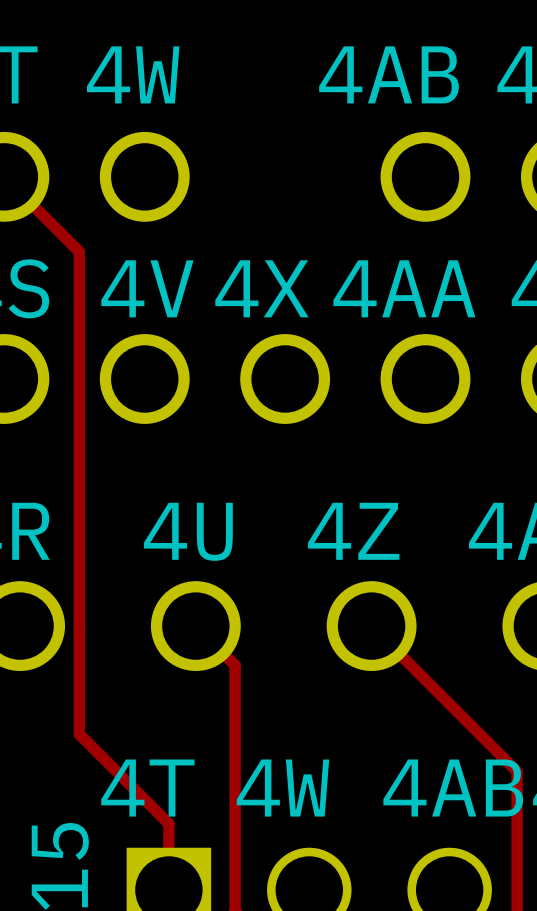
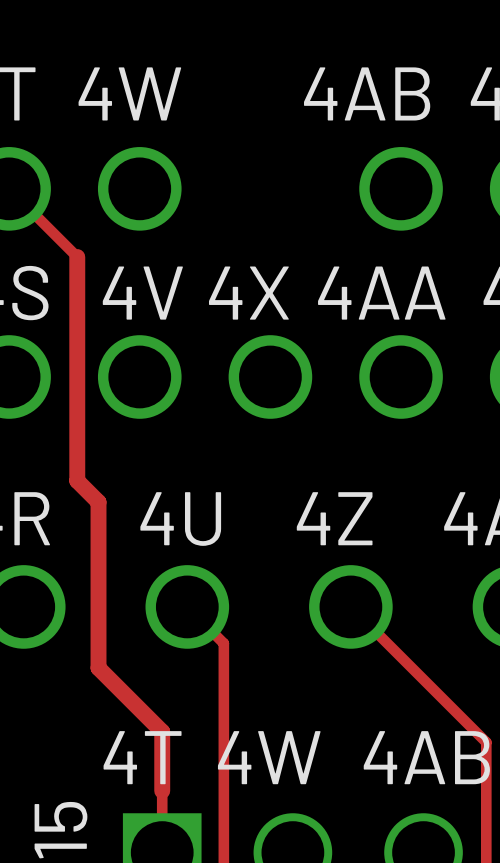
track: (77, 250) (79, 251) (79, 734) (168, 823) -> (77, 257) (77, 480) (98, 502) (98, 668) (162, 731) (162, 790)

